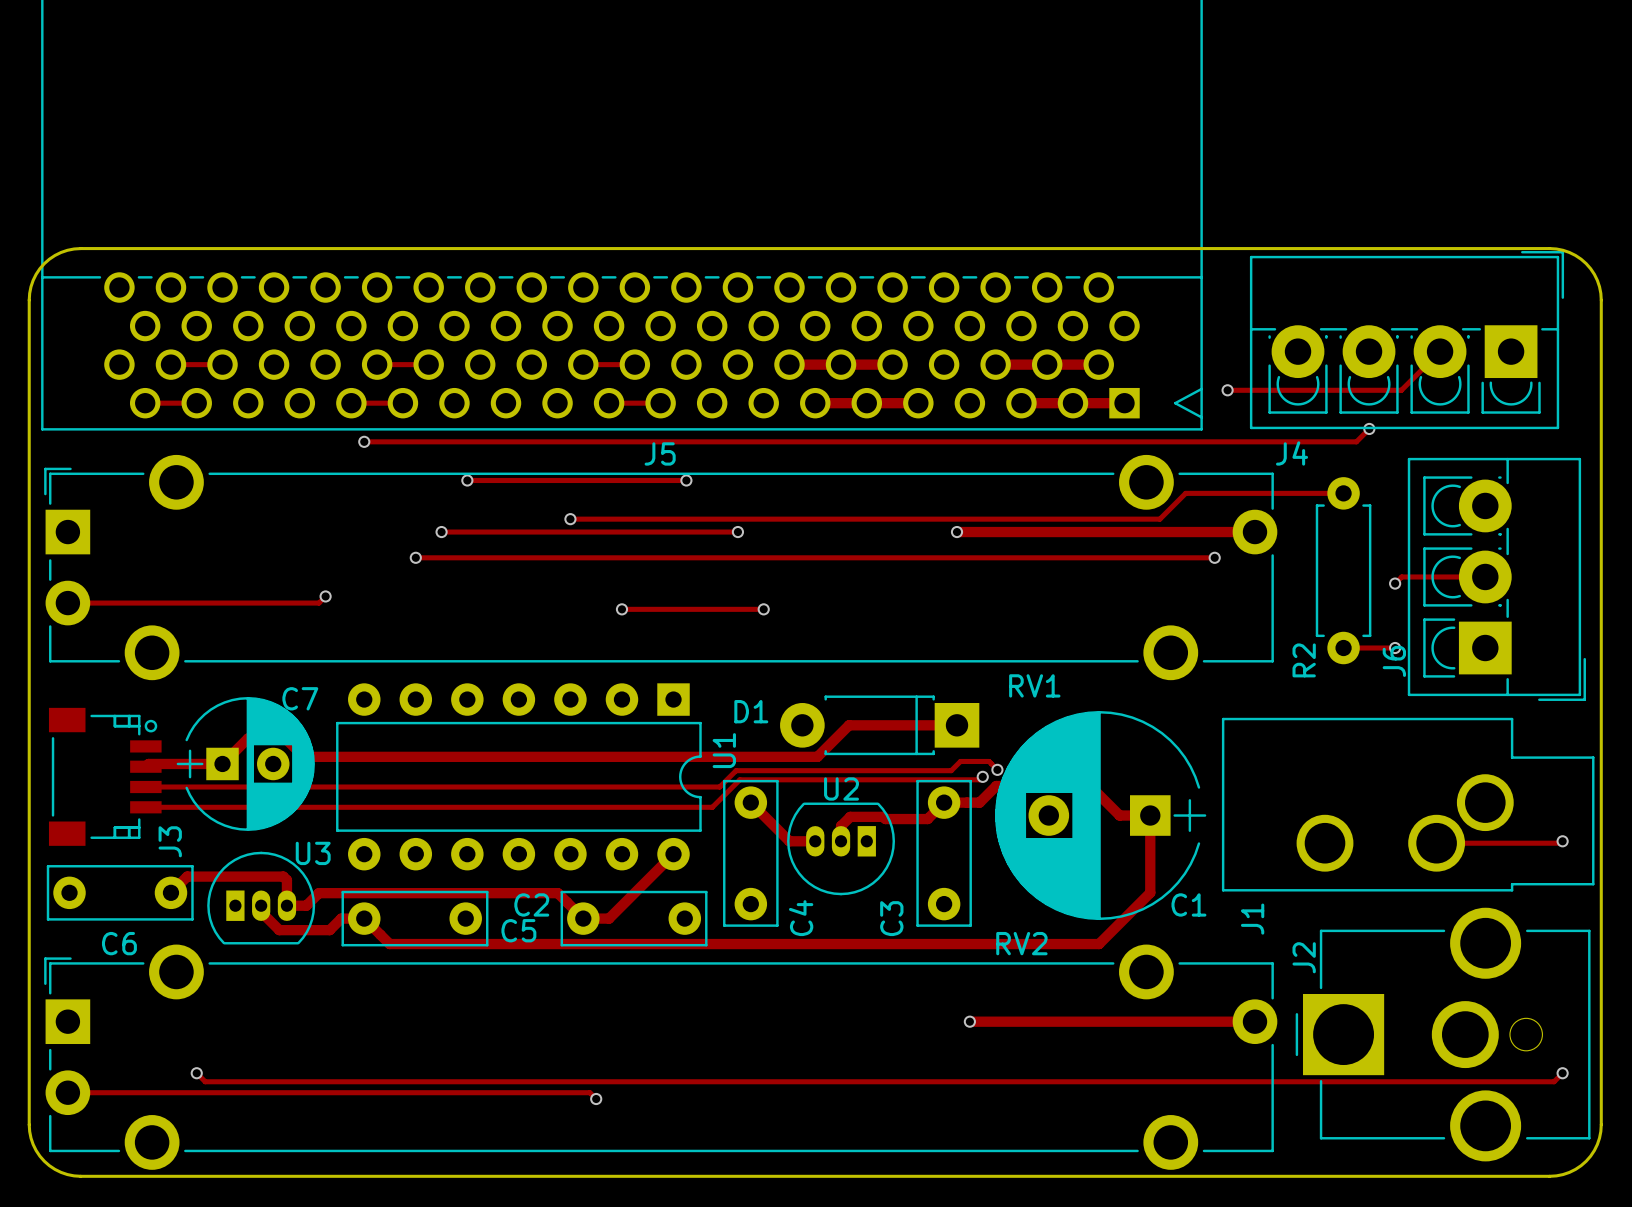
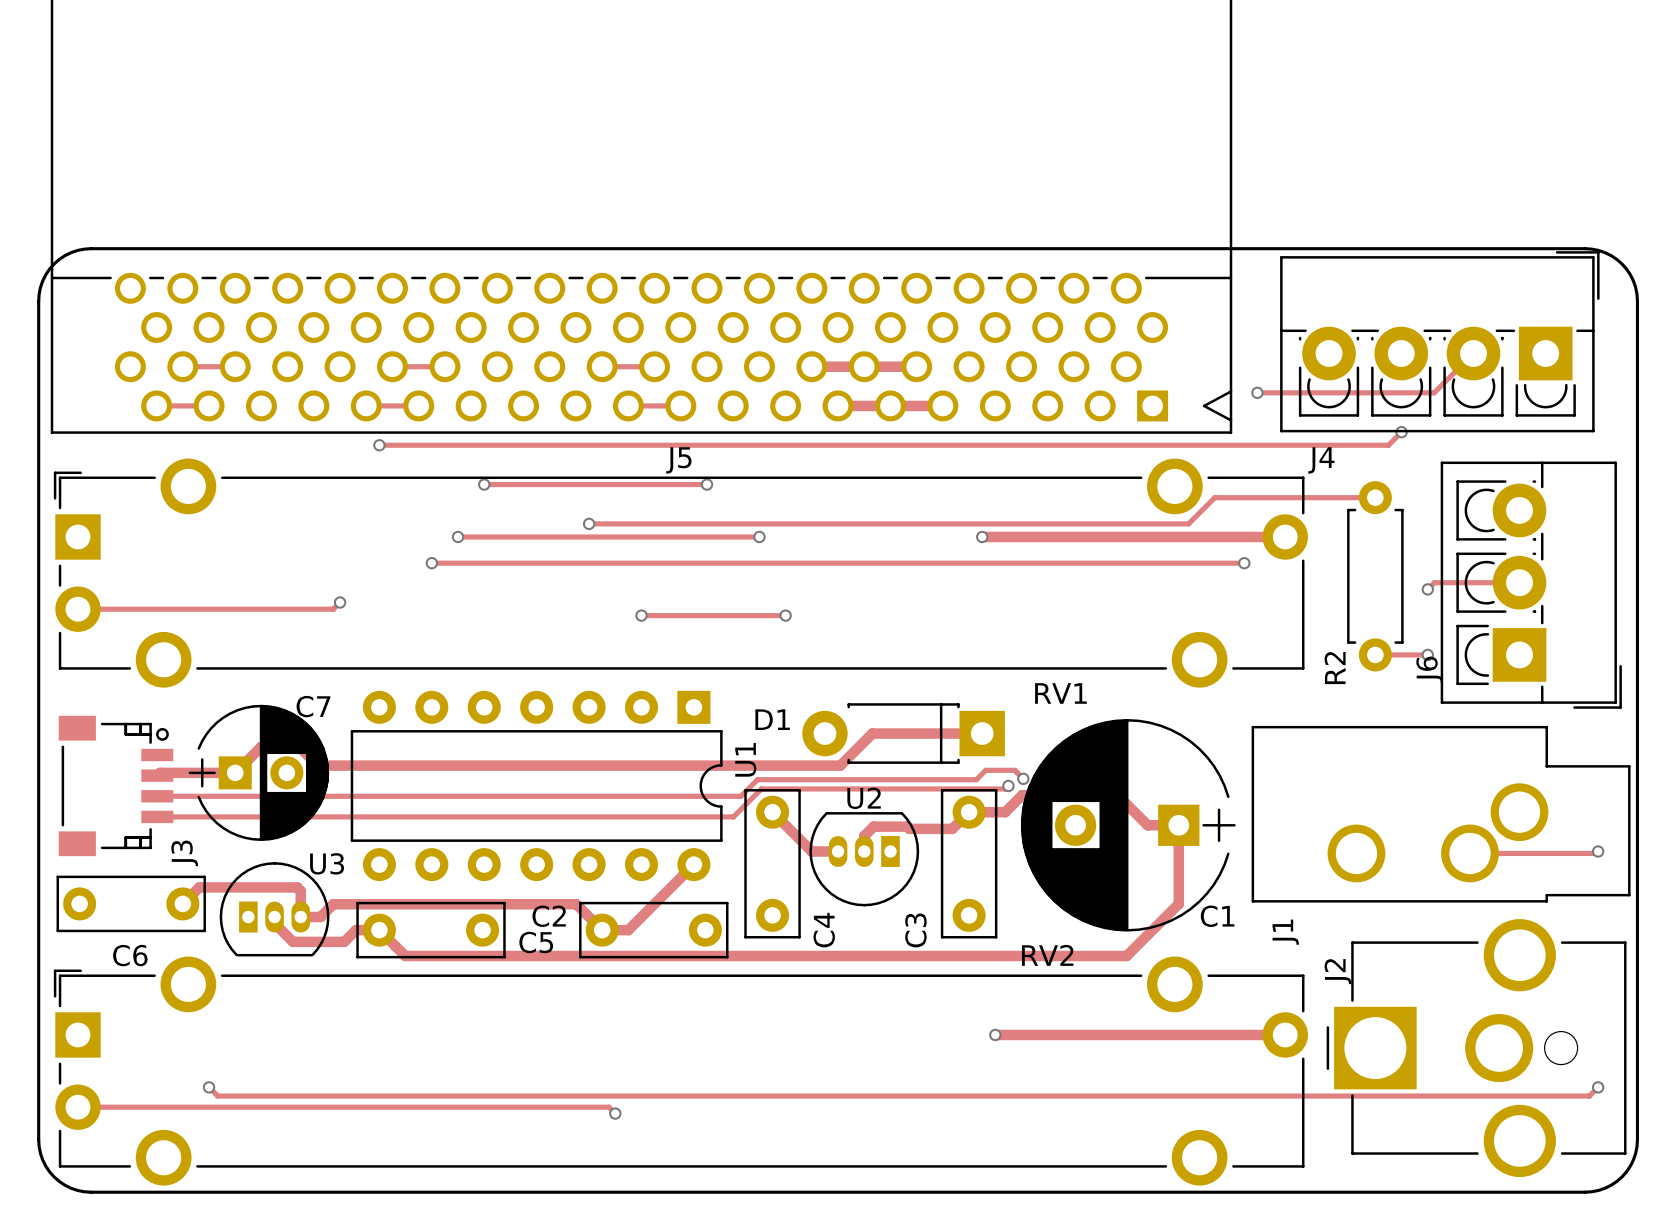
track: (995, 364) (1098, 364) -> none
track: (1021, 403) (1124, 403) -> none

